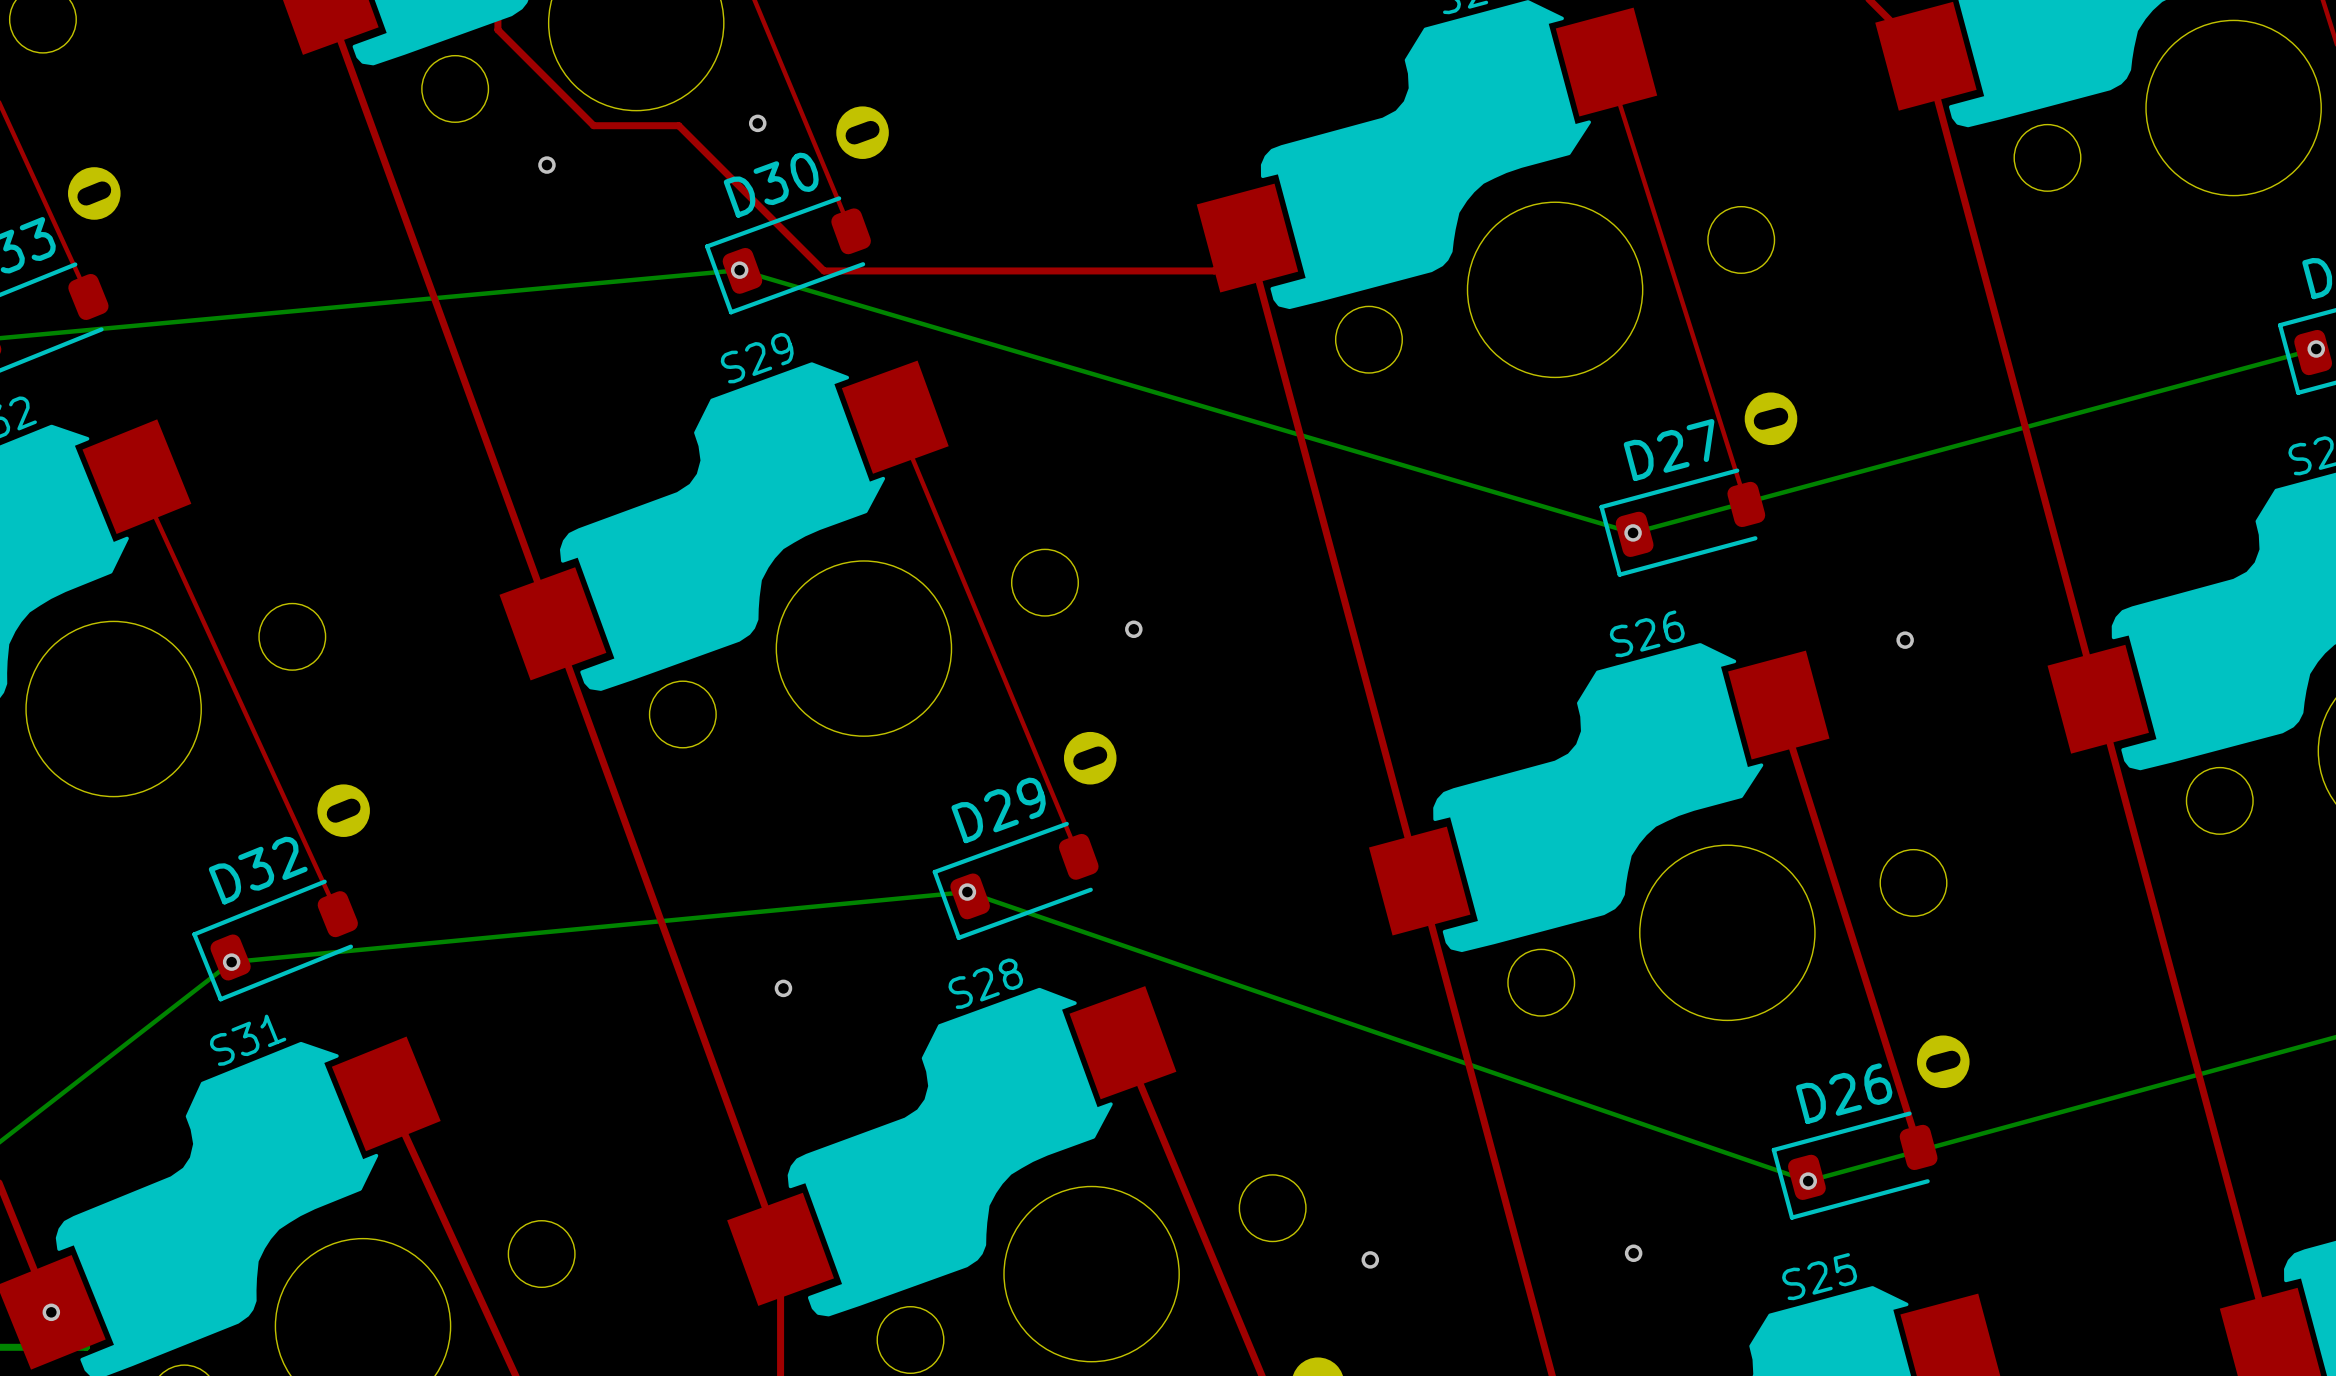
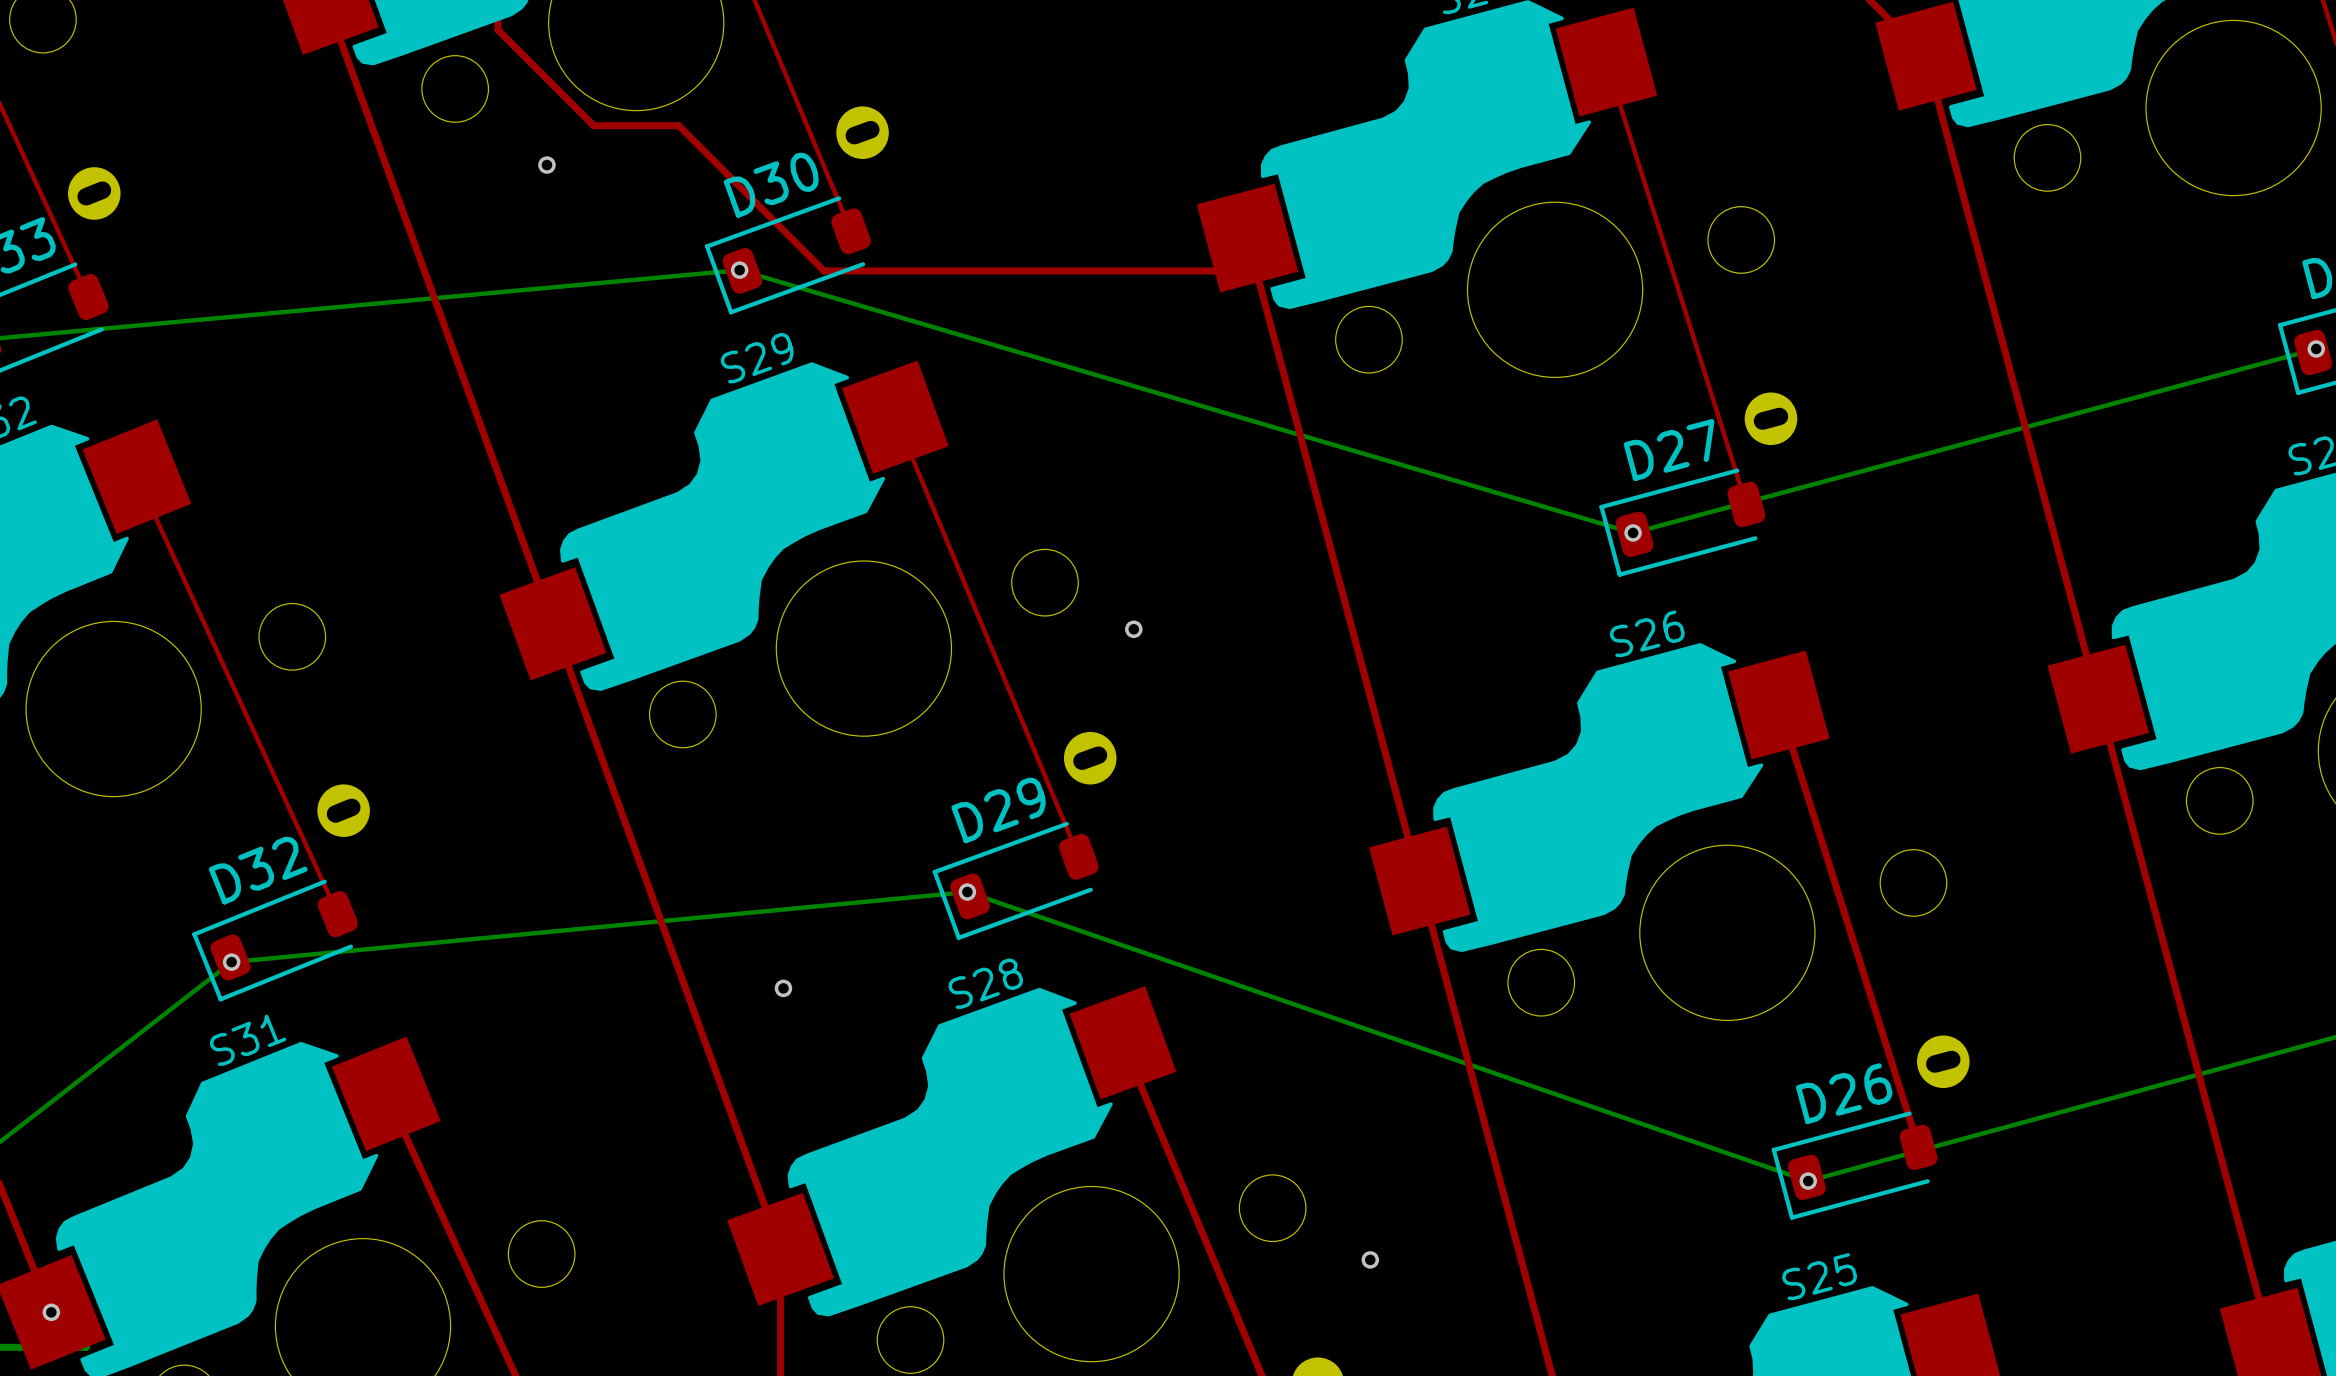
via: (757, 123) -> none
via: (1905, 640) -> none
via: (1633, 1253) -> none

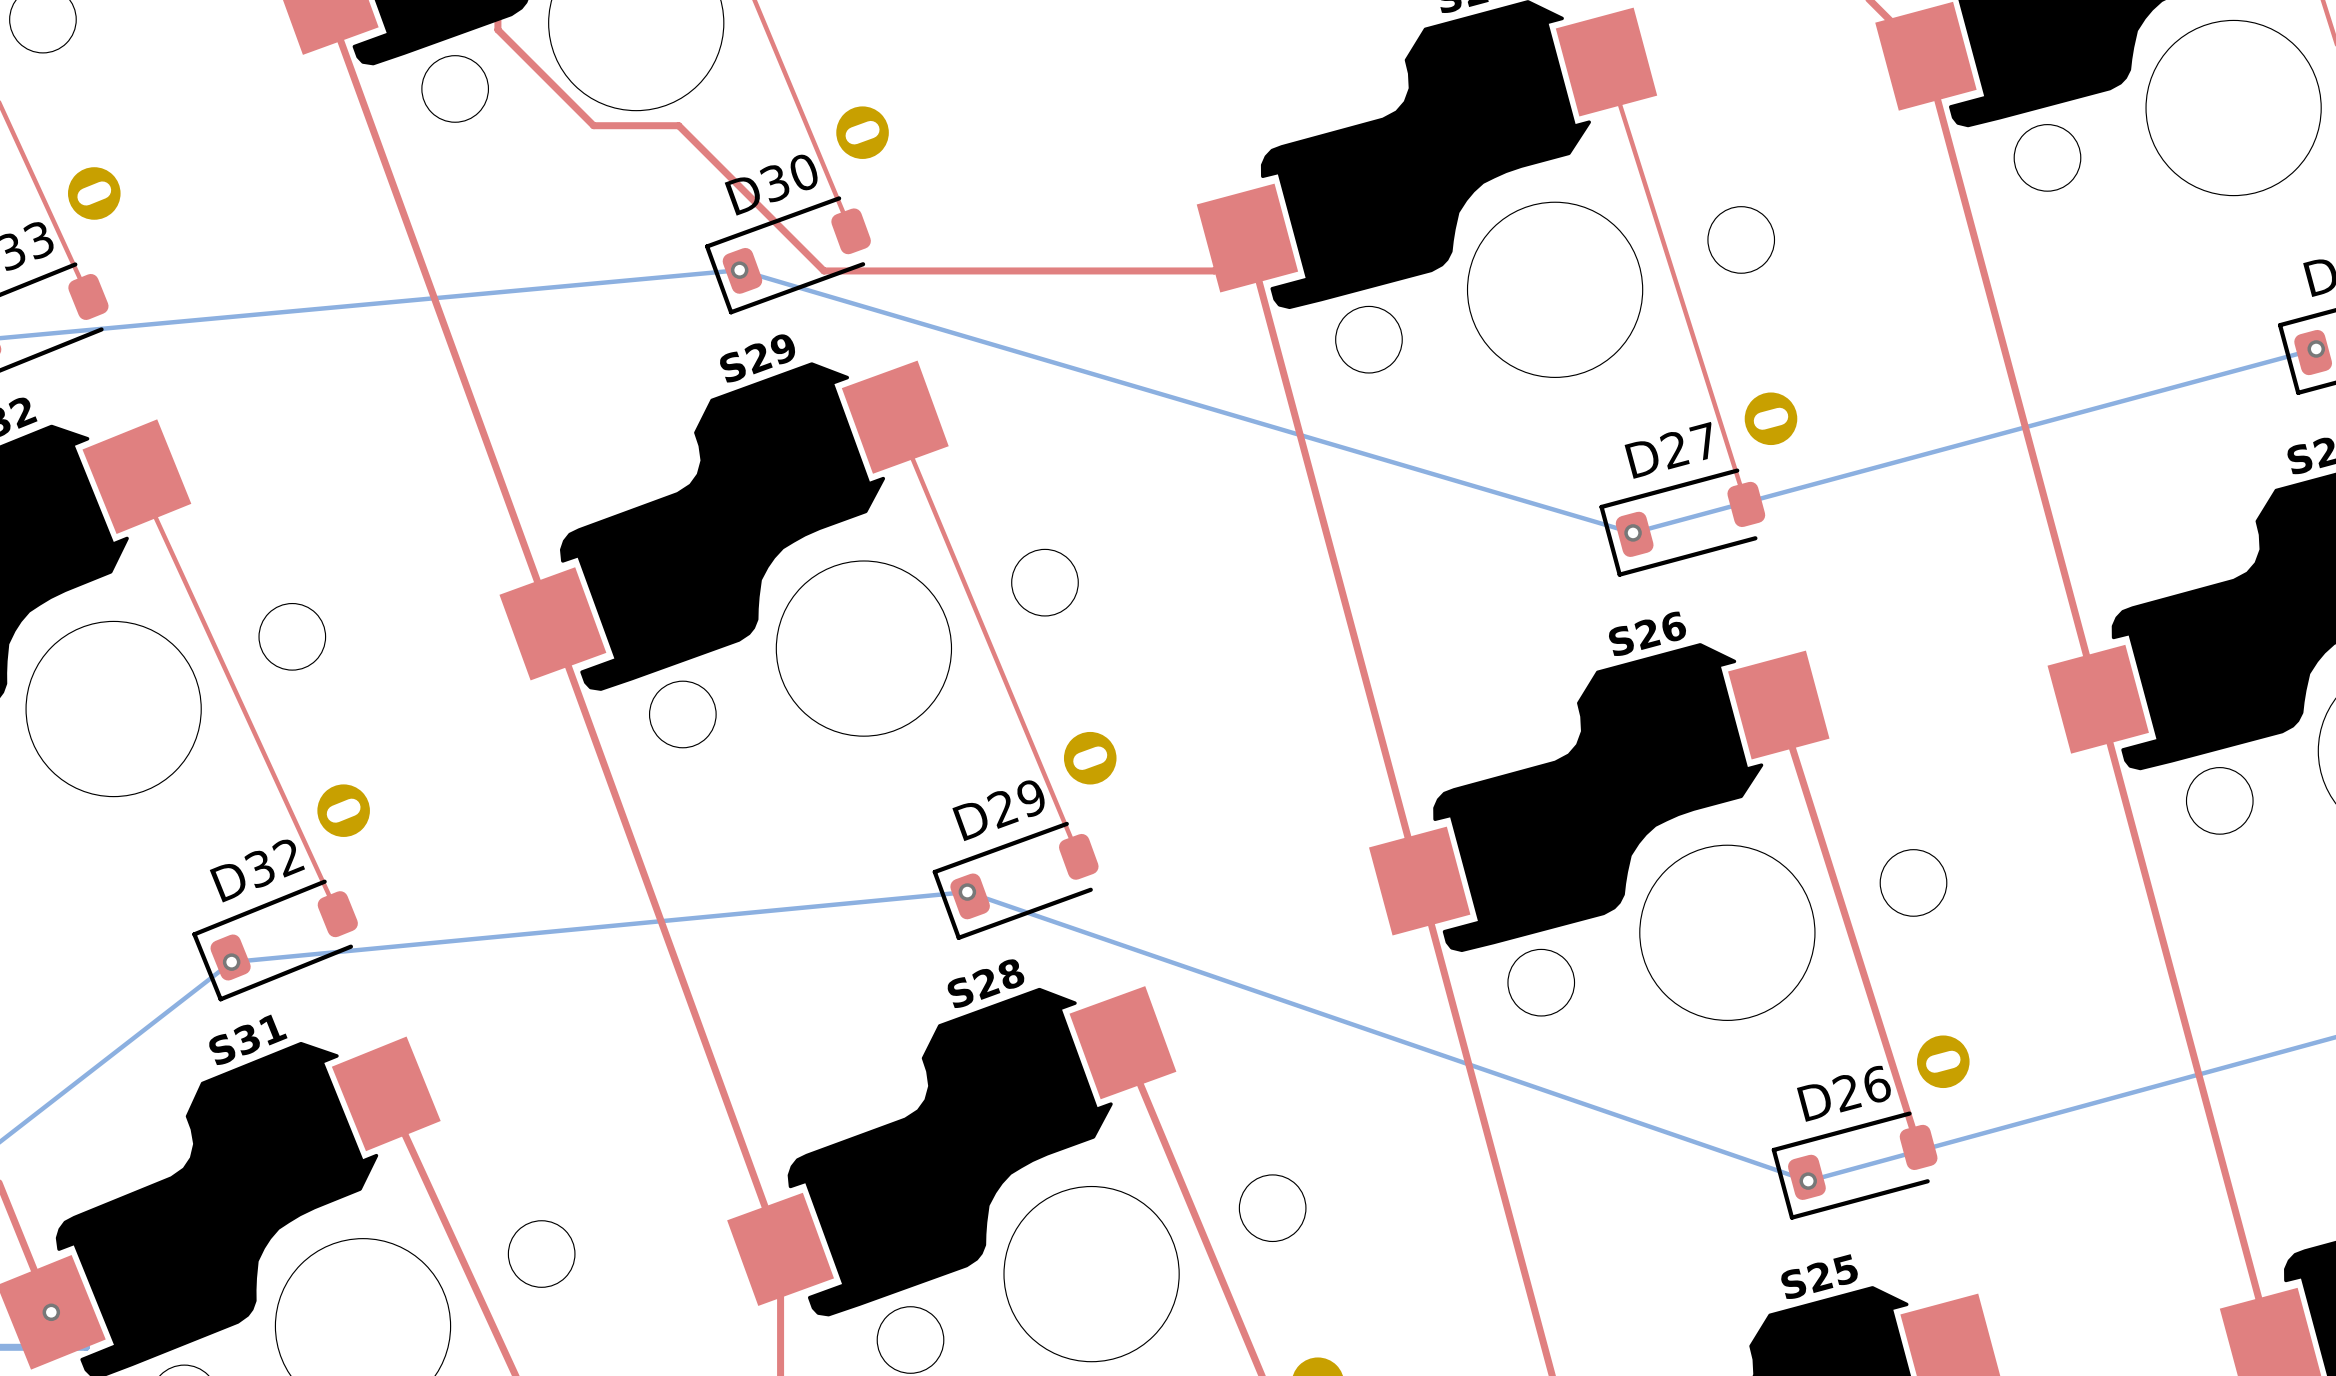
via: (546, 165) -> none
via: (1133, 629) -> none
via: (783, 988) -> none
via: (1370, 1259) -> none

